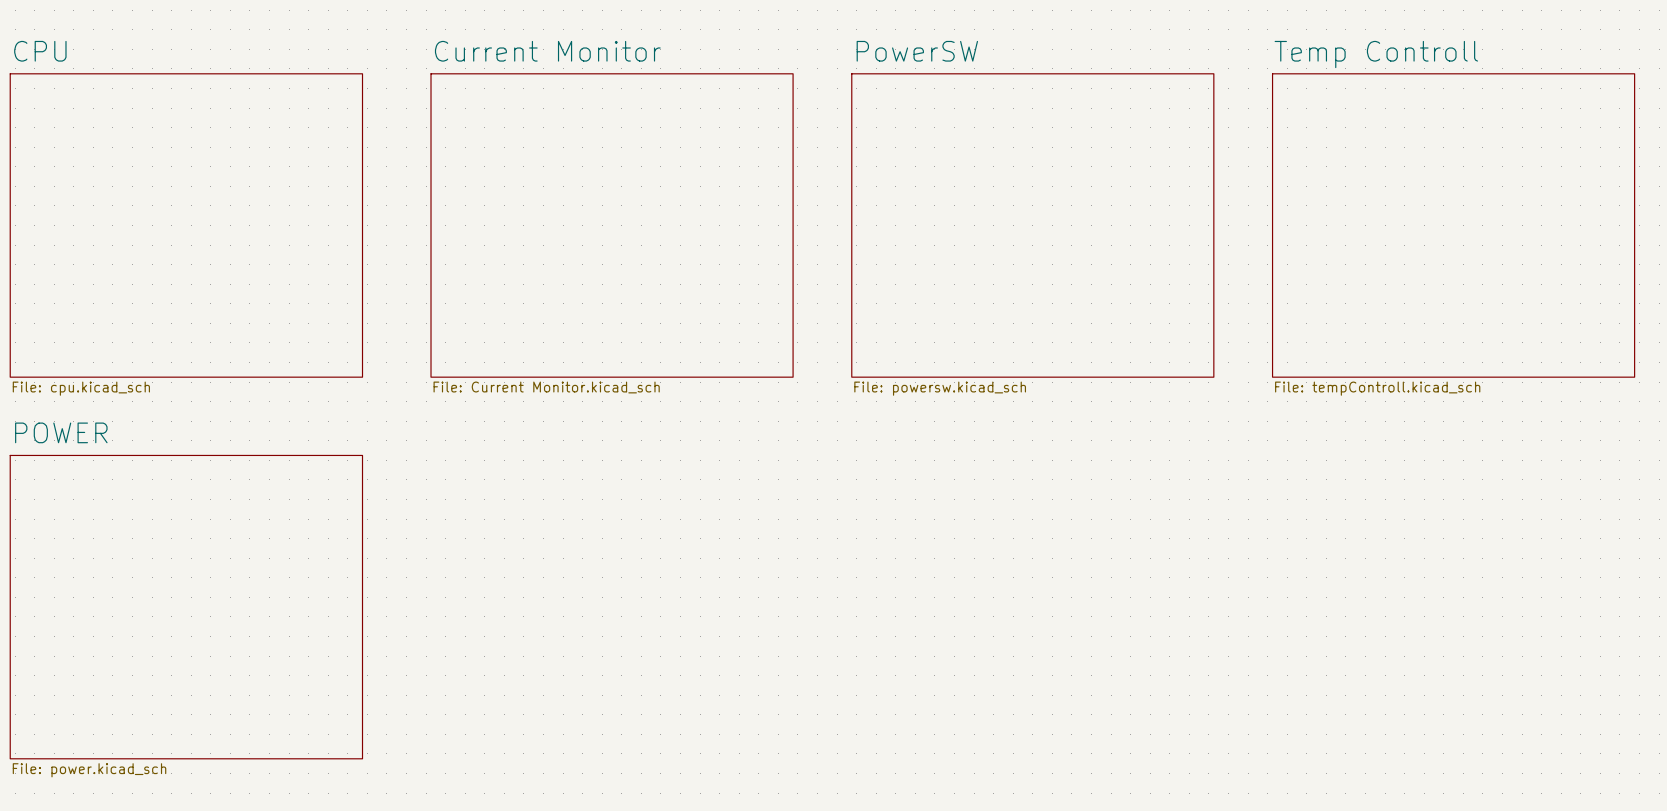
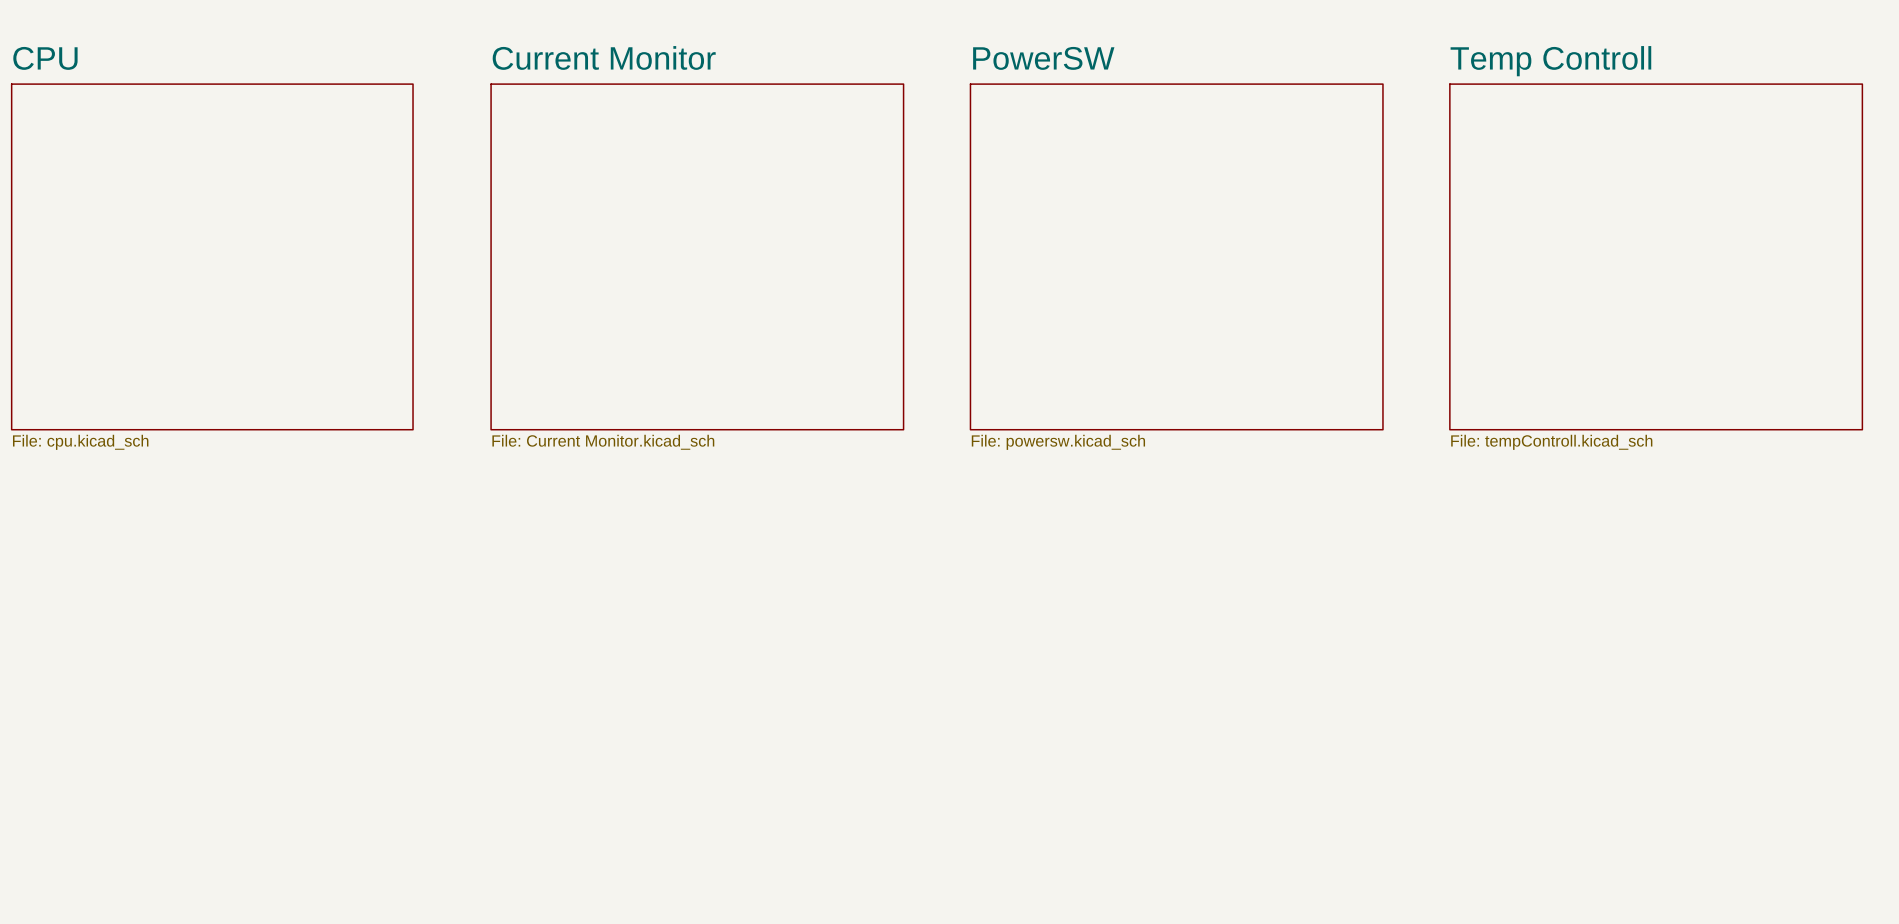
sheet POWER: File: power.kicad_sch (186, 607) -> none

